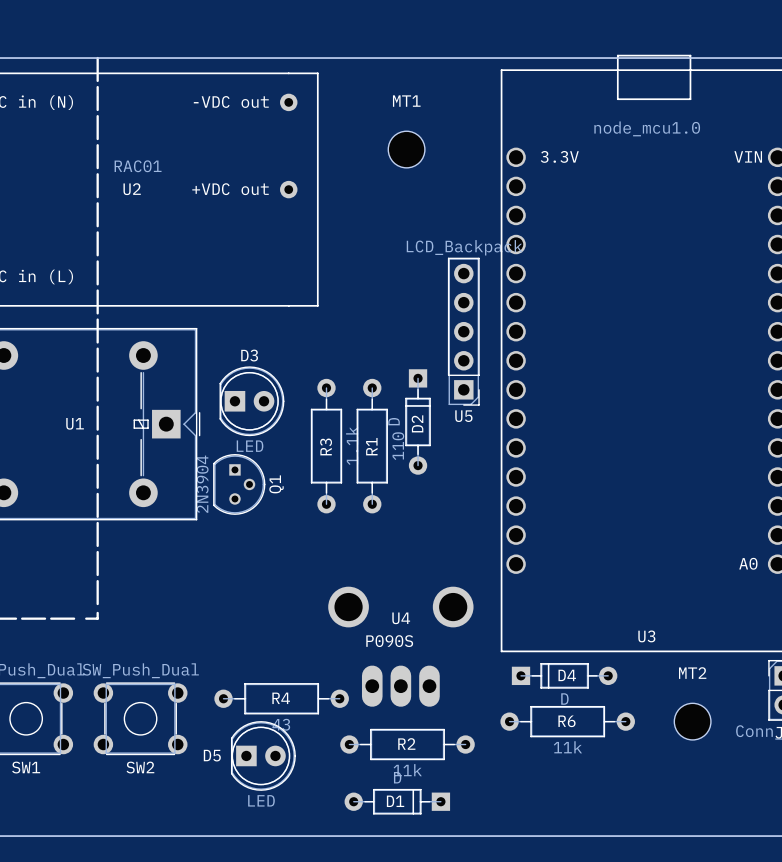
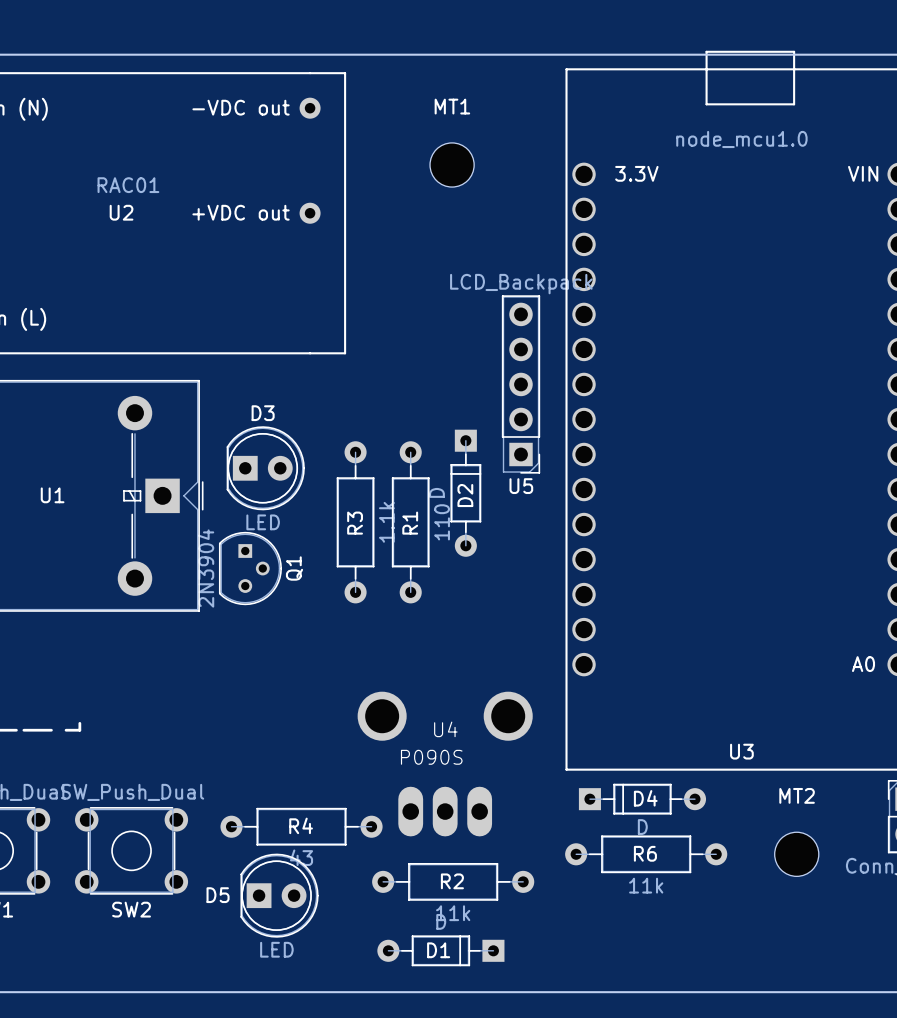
line: (97, 58) (97, 80) -> none
line: (97, 87) (97, 109) -> none
line: (97, 116) (97, 139) -> none
line: (97, 145) (97, 168) -> none
line: (97, 174) (97, 197) -> none
line: (97, 203) (97, 226) -> none
line: (97, 232) (97, 255) -> none
line: (97, 261) (97, 284) -> none
line: (97, 290) (97, 313) -> none
line: (97, 319) (97, 342) -> none
line: (97, 348) (97, 371) -> none
line: (97, 377) (97, 400) -> none
line: (97, 406) (97, 429) -> none
line: (97, 435) (97, 458) -> none
line: (97, 464) (97, 487) -> none
line: (97, 493) (97, 516) -> none
line: (97, 523) (97, 545) -> none
line: (97, 552) (97, 574) -> none
line: (97, 581) (97, 604) -> none

